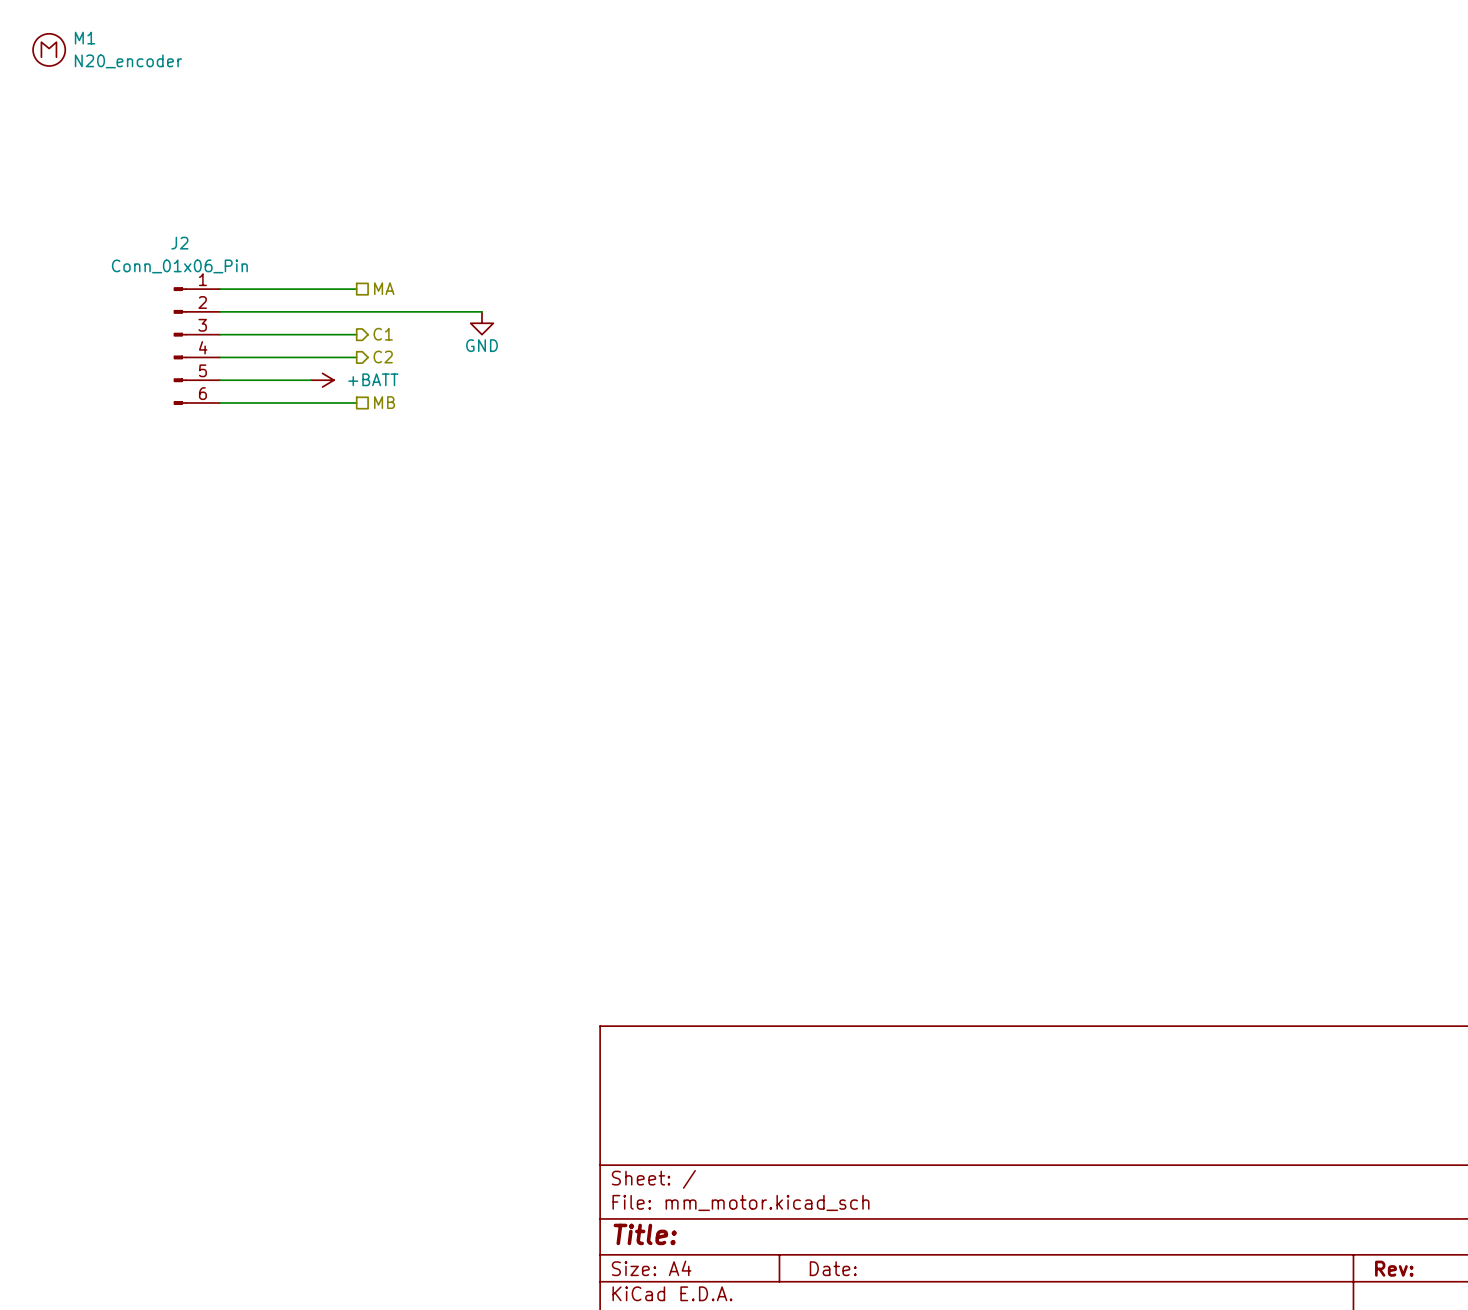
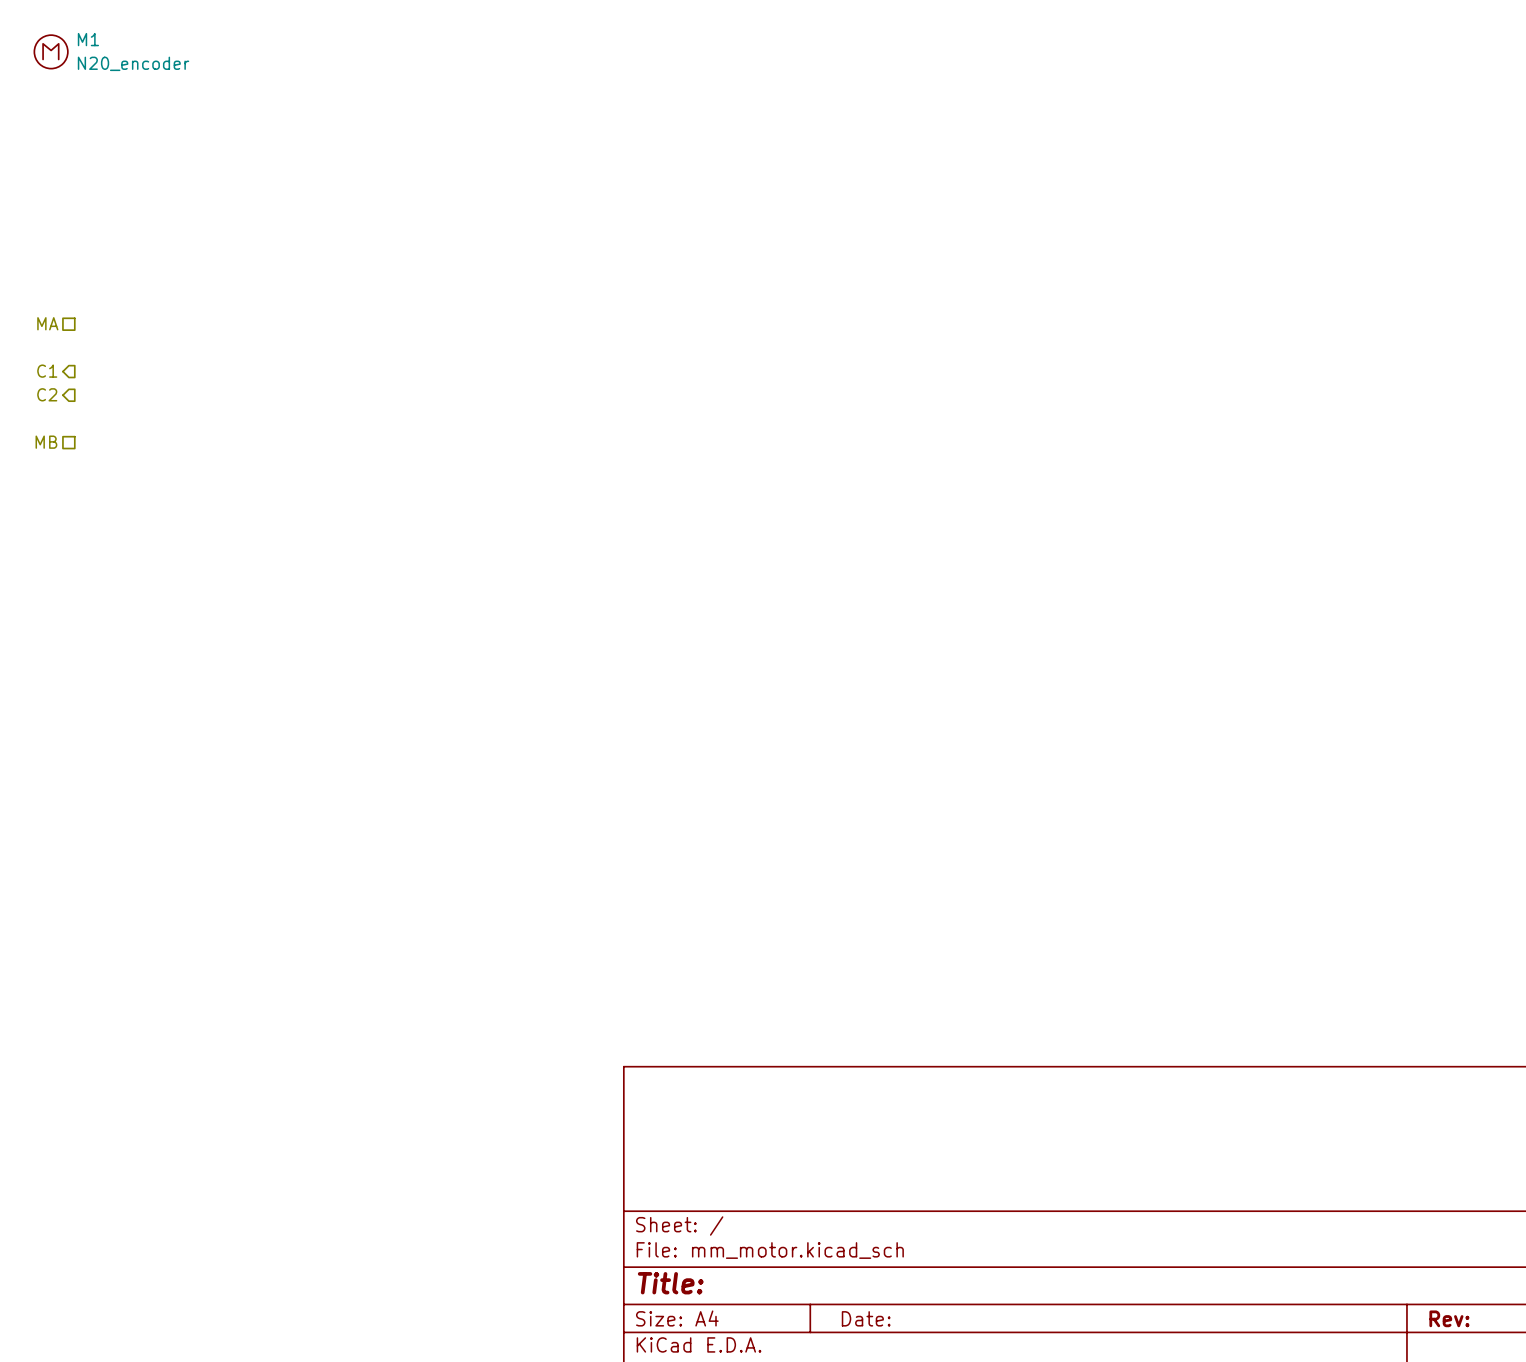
hierarchical label: MA (384, 288) -> none
wire: (220, 289) (356, 289) -> none
hierarchical label: none -> MA (47, 323)
wire: (220, 311) (481, 311) -> none
power symbol: GND (481, 323) -> none
wire: (220, 334) (356, 334) -> none
hierarchical label: C1 (383, 334) -> none
J2: Conn_01x06_Pin (196, 346) -> none
hierarchical label: none -> C1 (47, 371)
wire: (220, 357) (356, 357) -> none
hierarchical label: C2 (383, 357) -> none
hierarchical label: none -> C2 (47, 394)
wire: (220, 380) (311, 380) -> none
power symbol: +BATT (322, 380) -> none
hierarchical label: MB (384, 402) -> none
wire: (220, 403) (356, 403) -> none
hierarchical label: none -> MB (46, 442)

